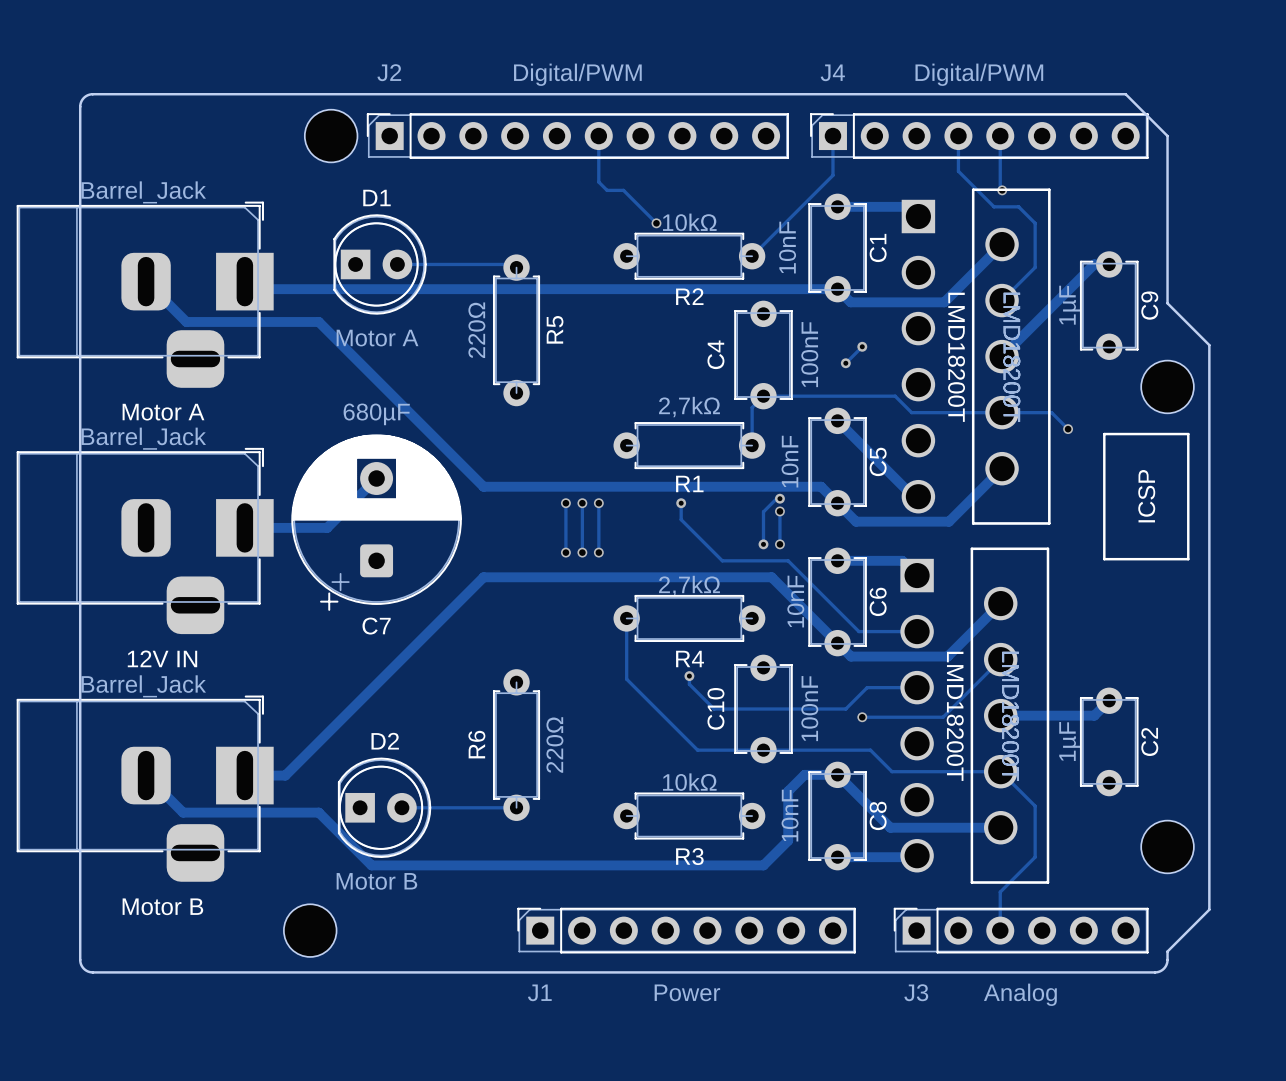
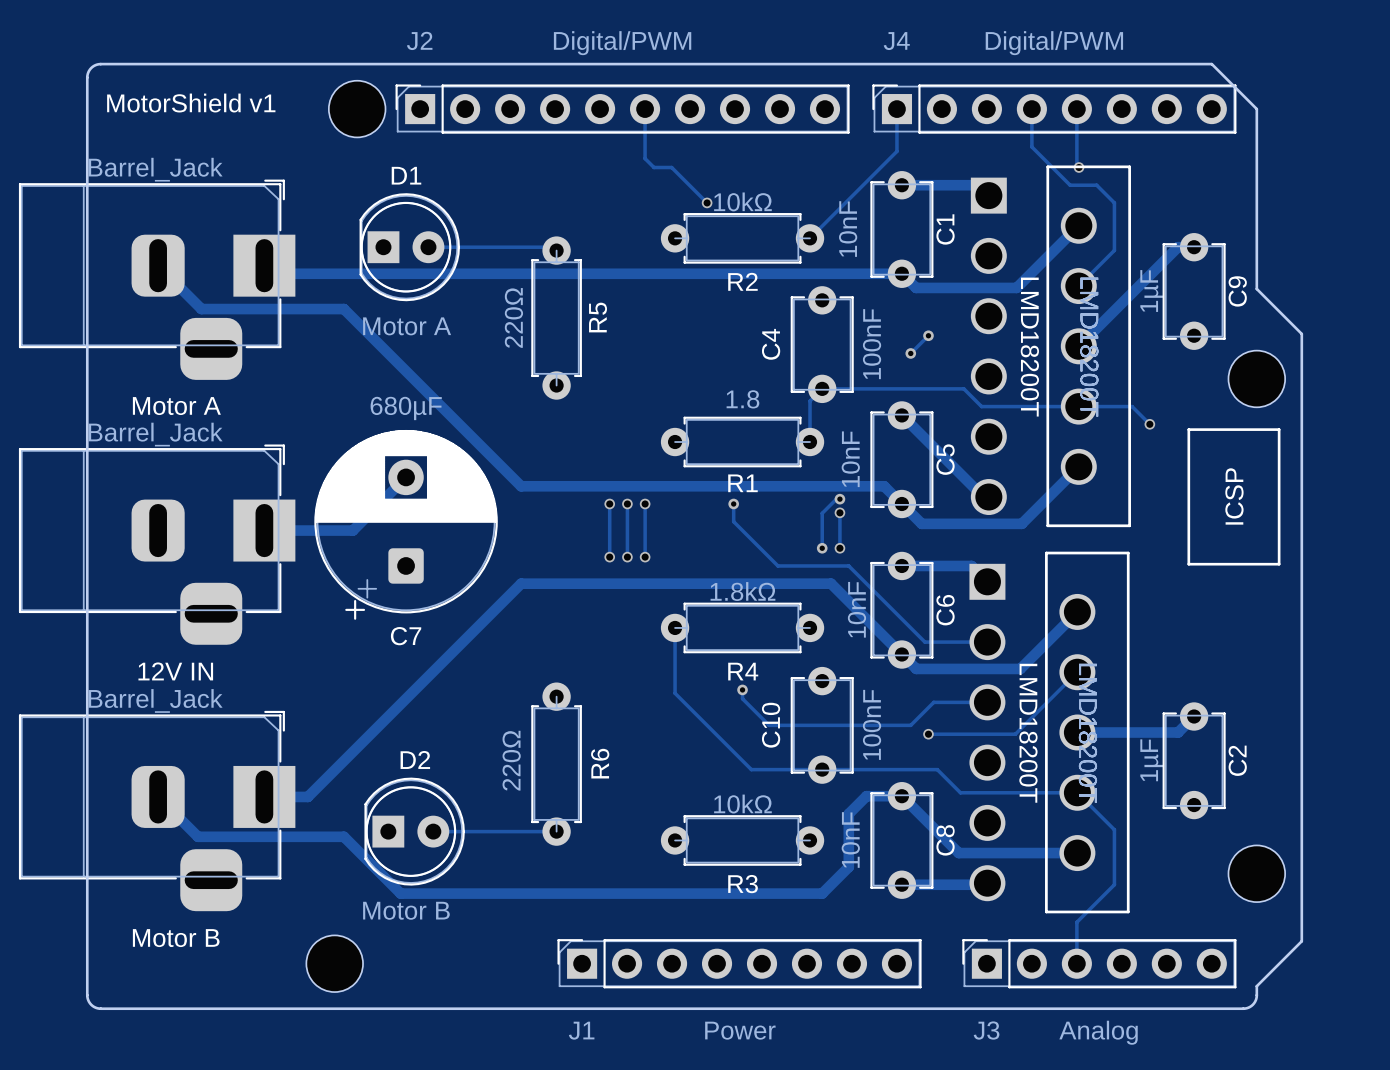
text: none -> MotorShield v1 (191, 103)
R1 value: 2,7kΩ (689, 407) -> 1.8 (742, 399)
R4 value: 2,7kΩ (689, 586) -> 1.8kΩ (742, 591)
R6 name position: R6 (476, 744) -> R6 (600, 763)
R6 value position: 220Ω (554, 744) -> 220Ω (511, 760)

